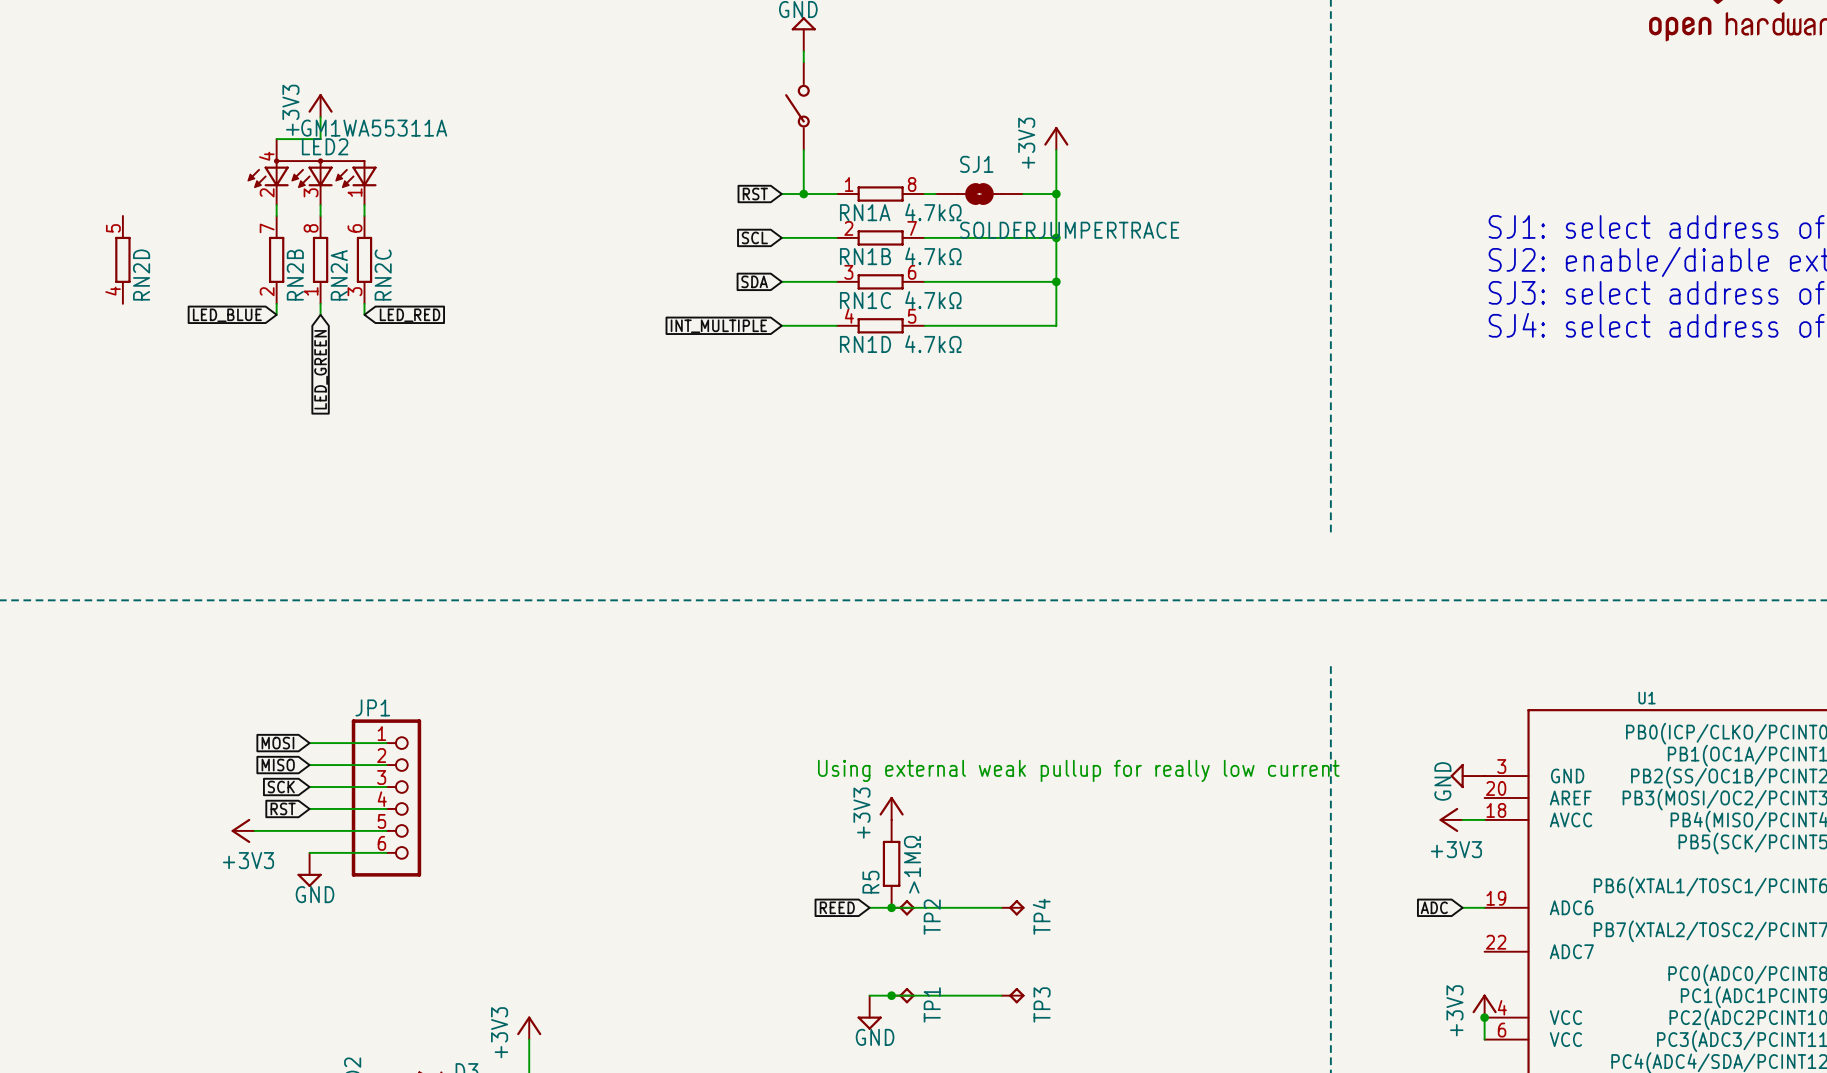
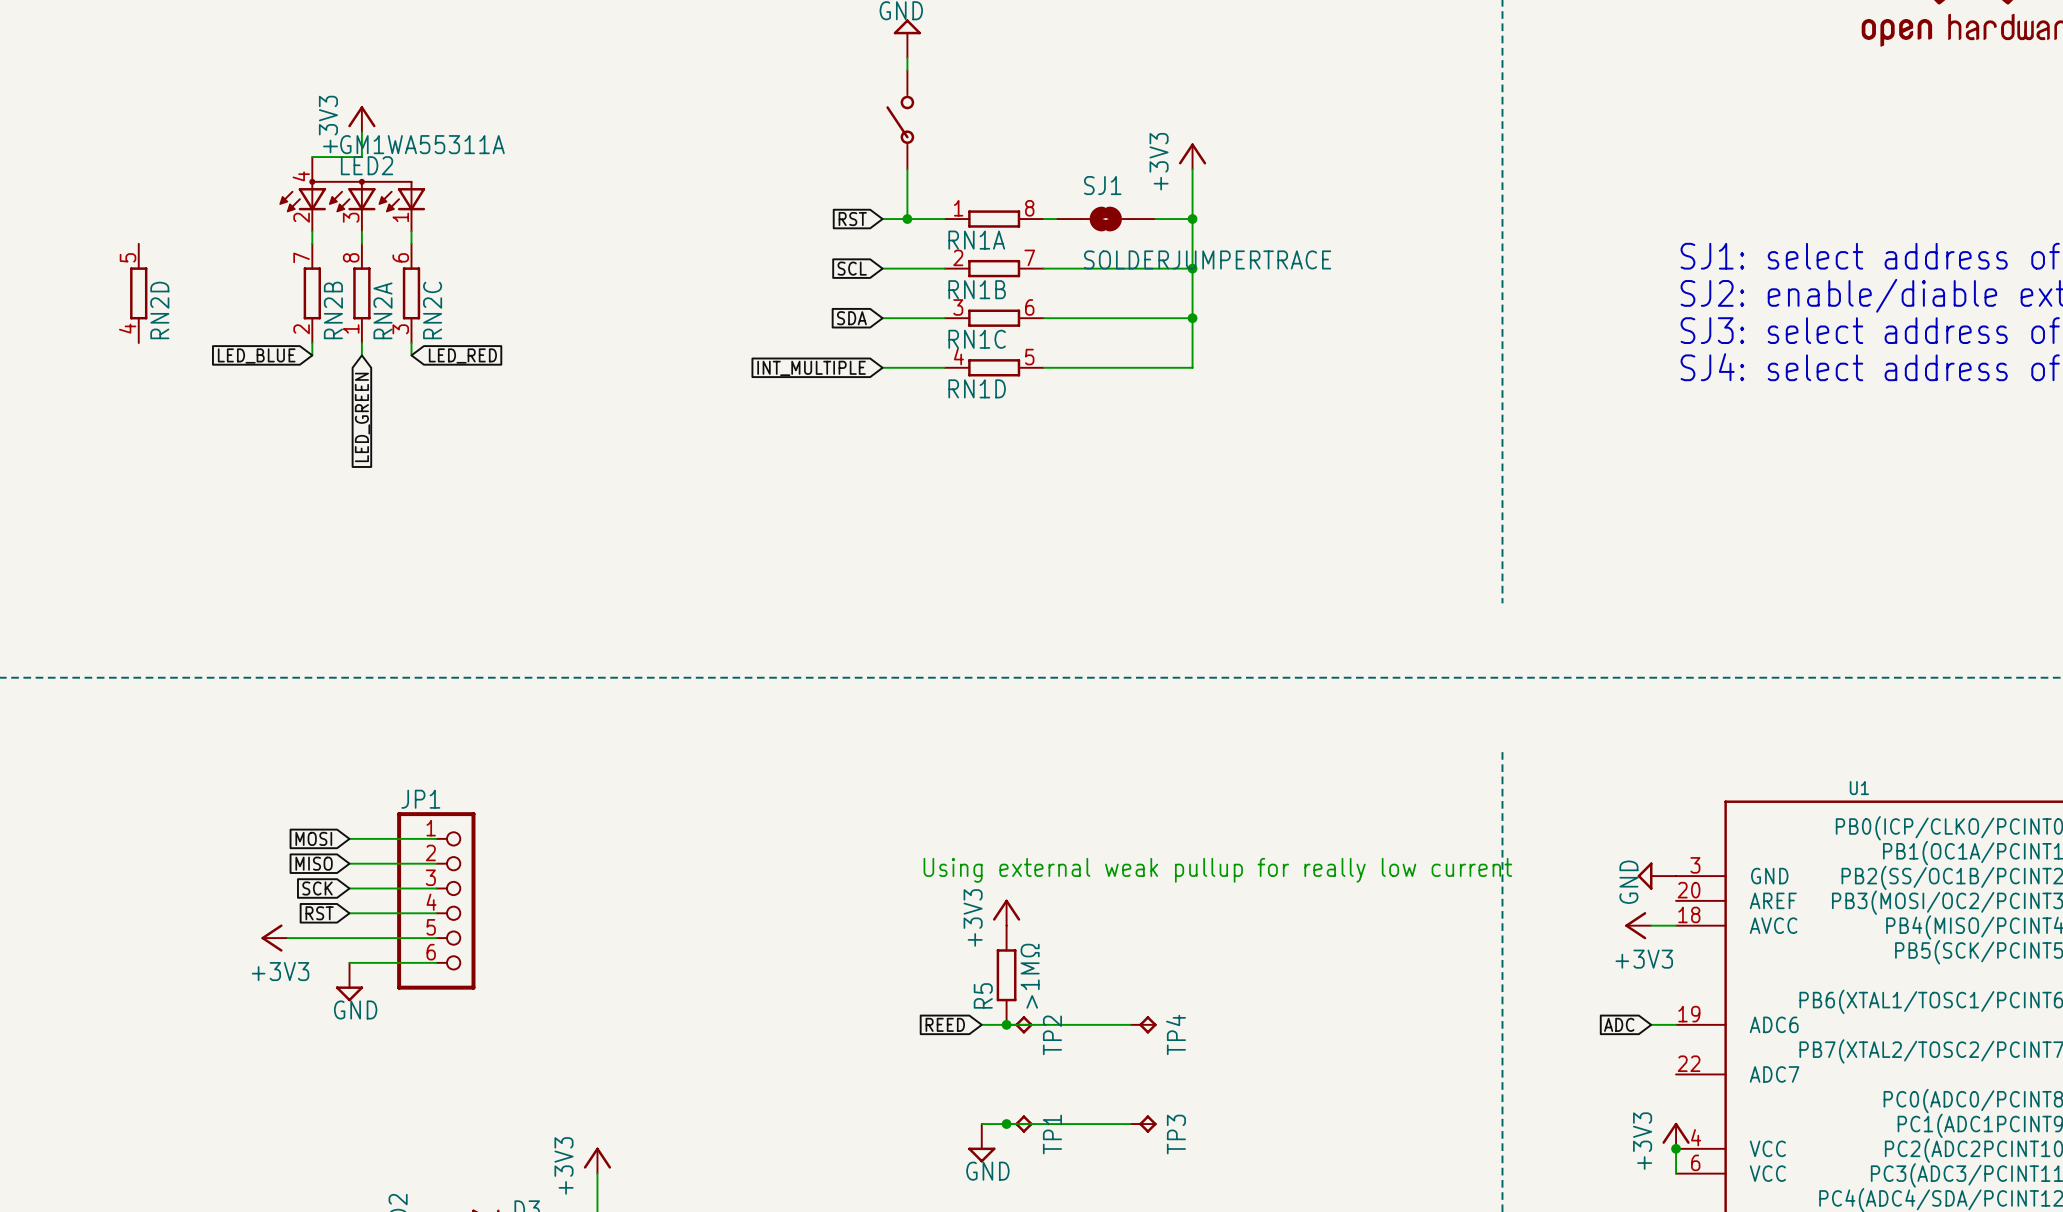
RN1A value: 4.7kΩ (933, 212) -> none
RN1B value: 4.7kΩ (933, 256) -> none
RN1C value: 4.7kΩ (933, 300) -> none
RN1D value: 4.7kΩ (933, 344) -> none

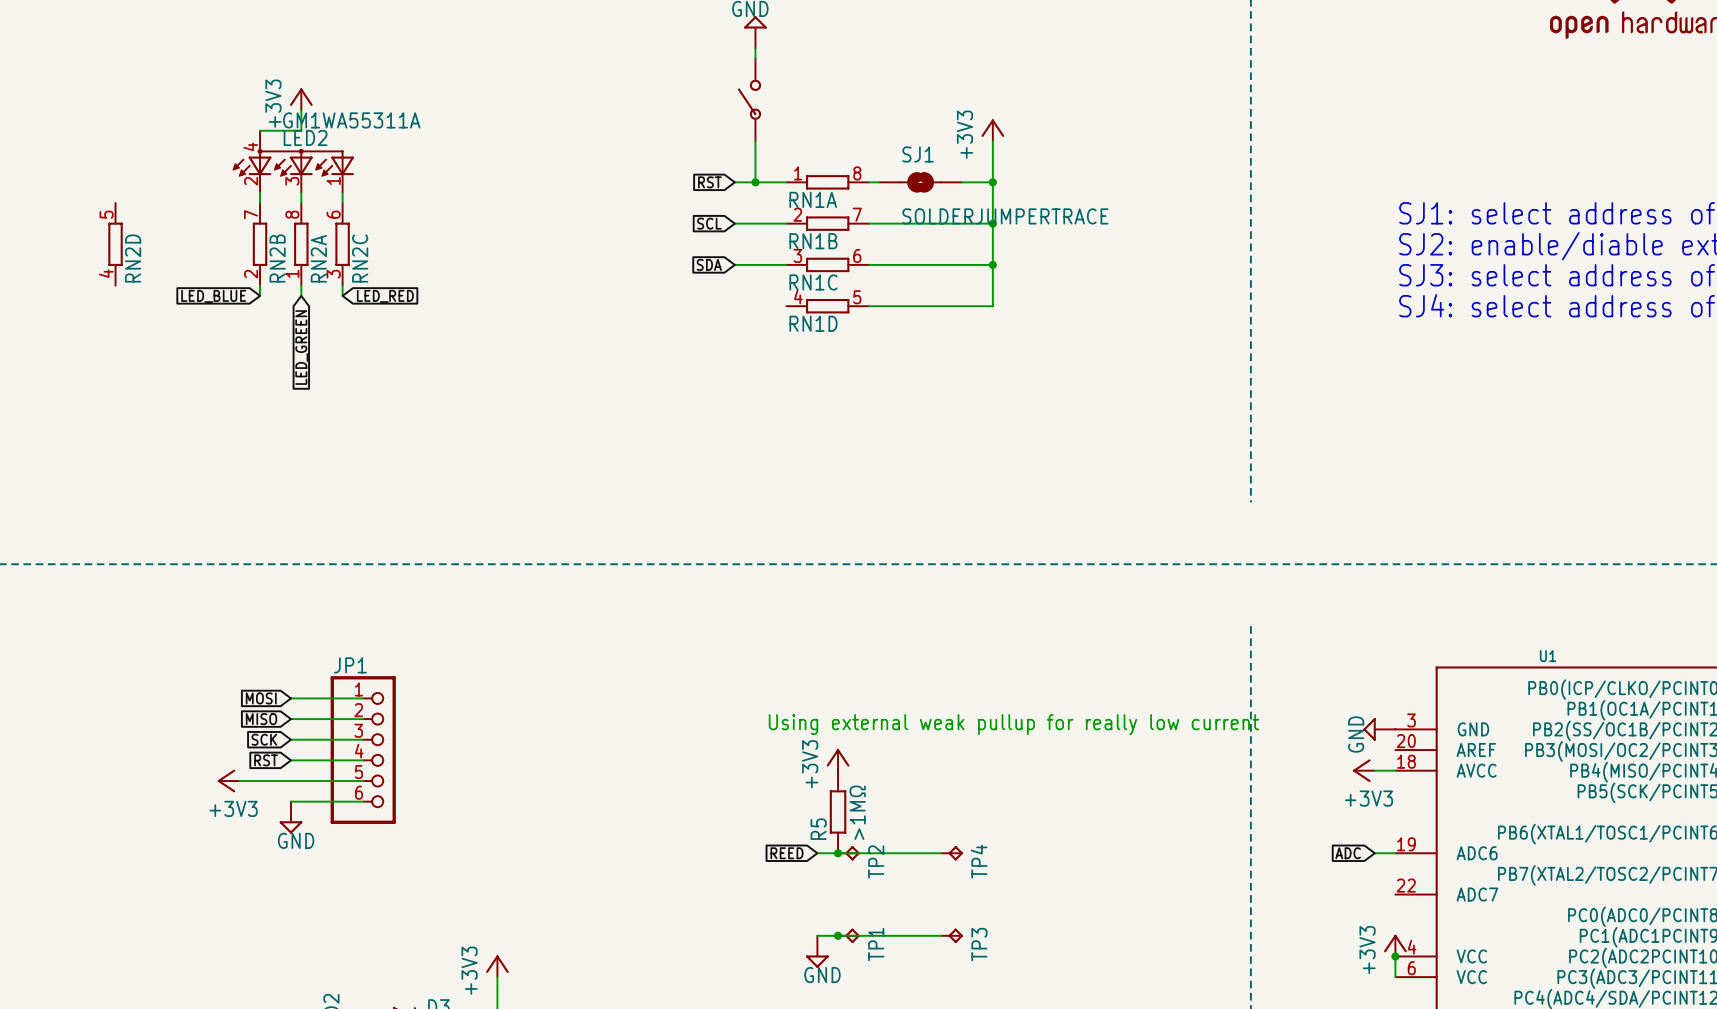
wire: (882, 367) (944, 367) -> none
global label: INT_MULTIPLE (811, 368) -> none

